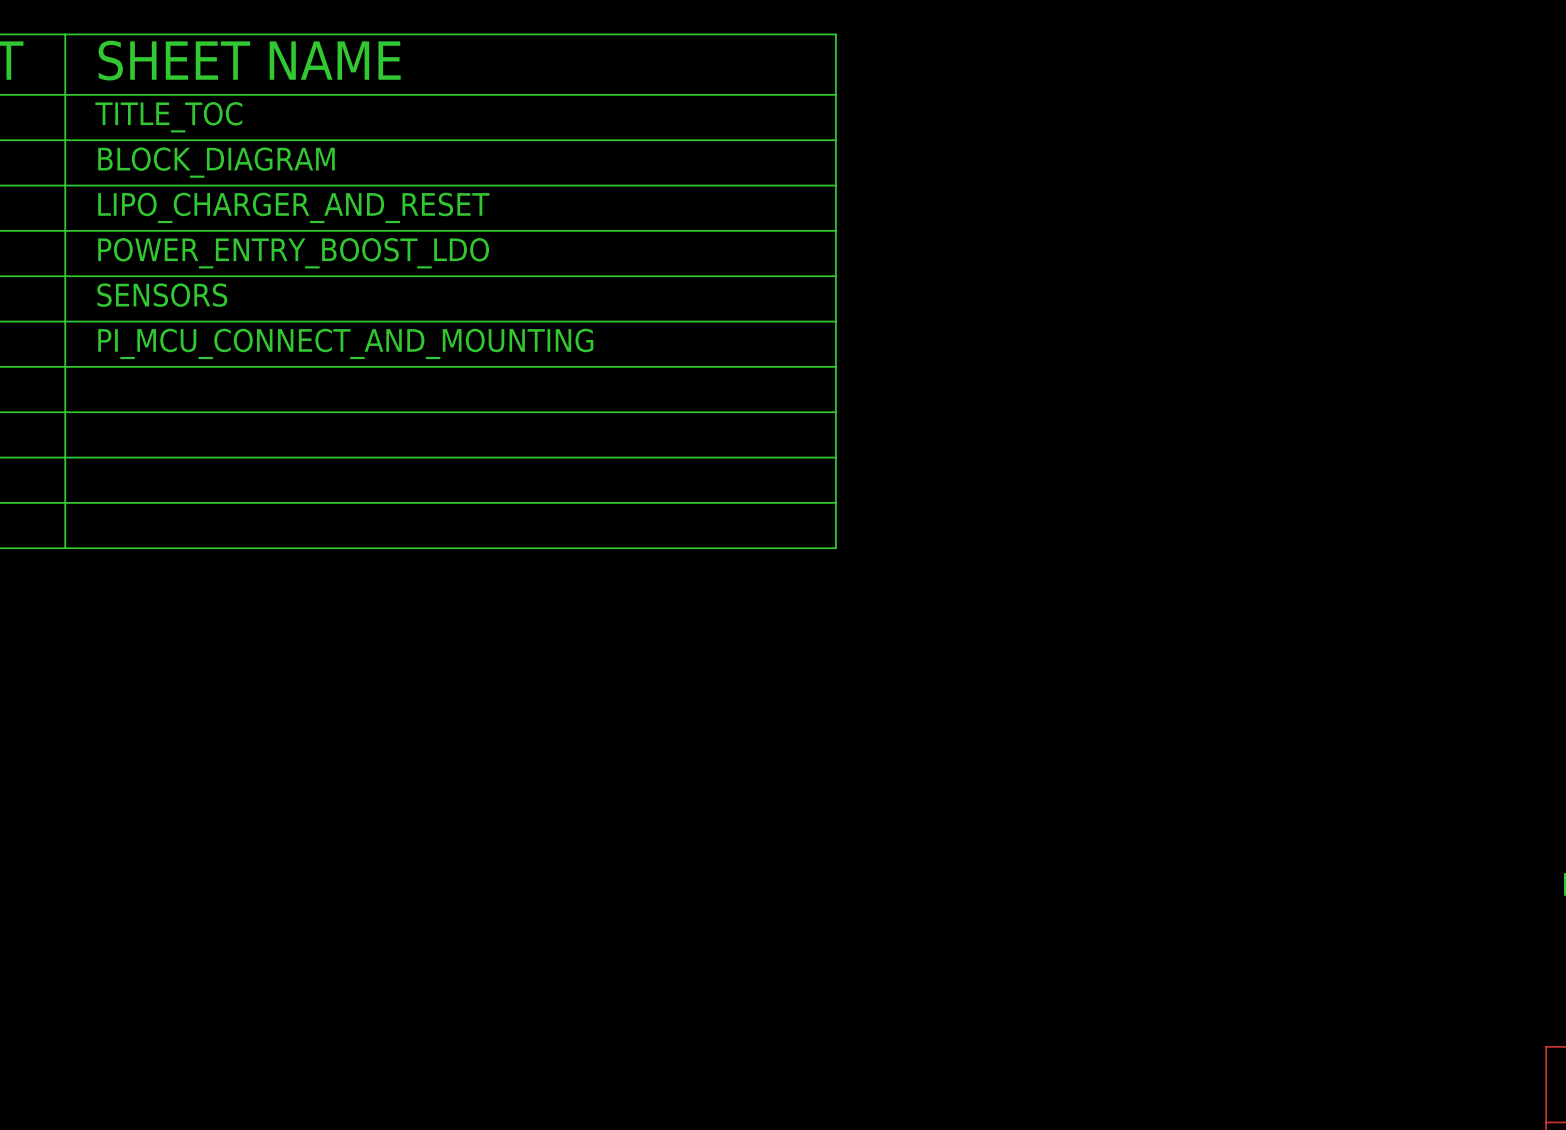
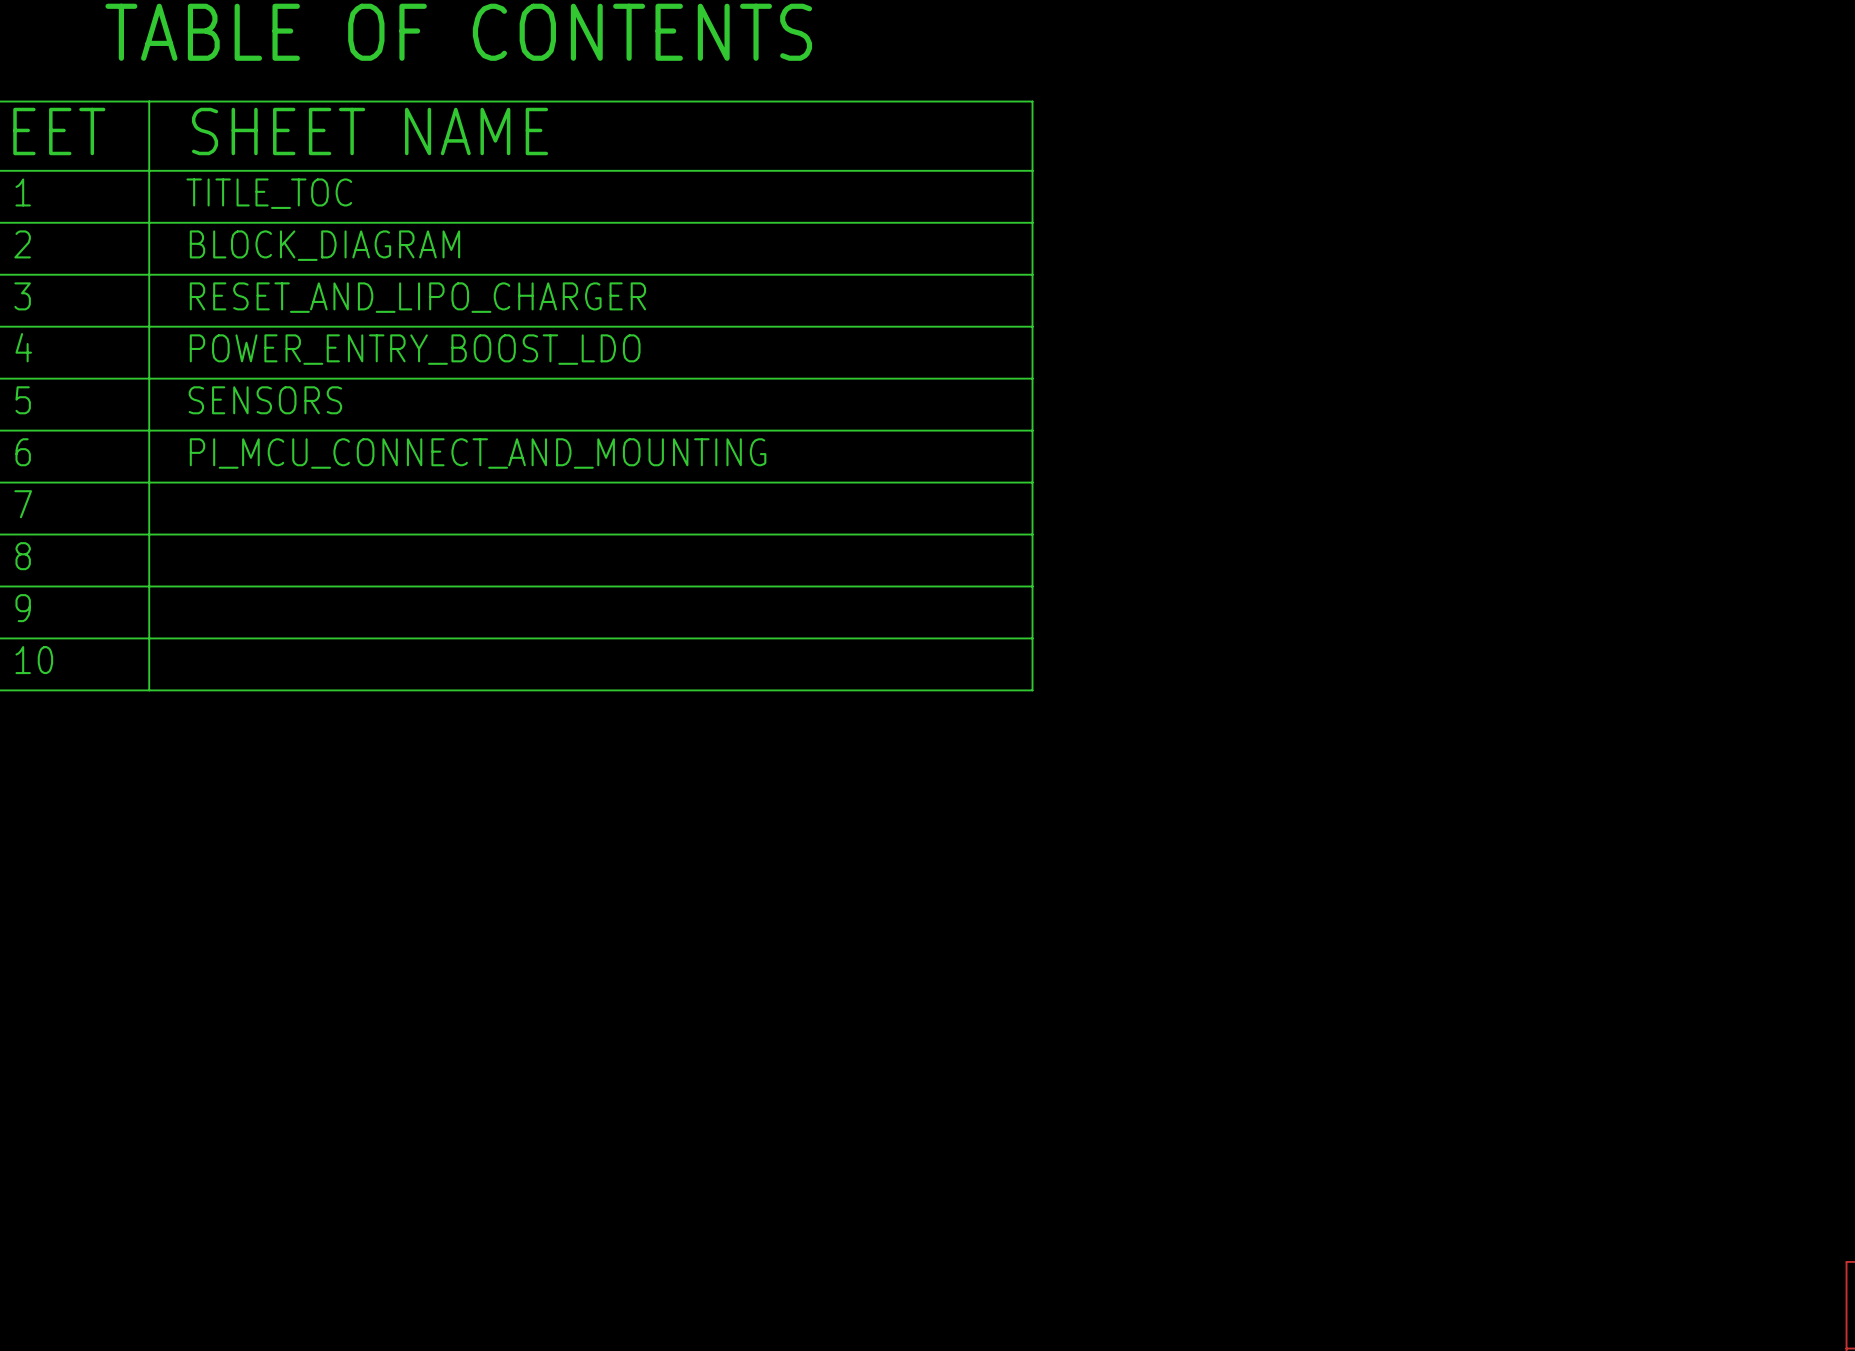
text: LIPO_CHARGER_AND_RESET (293, 207) -> RESET_AND_LIPO_CHARGER (417, 297)

